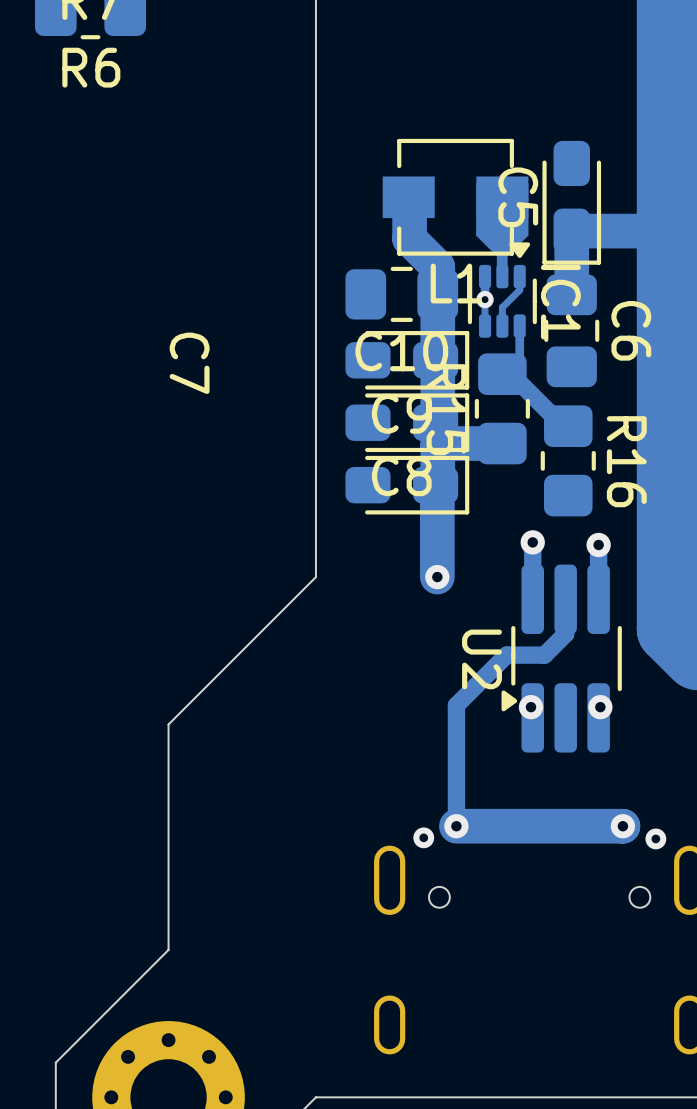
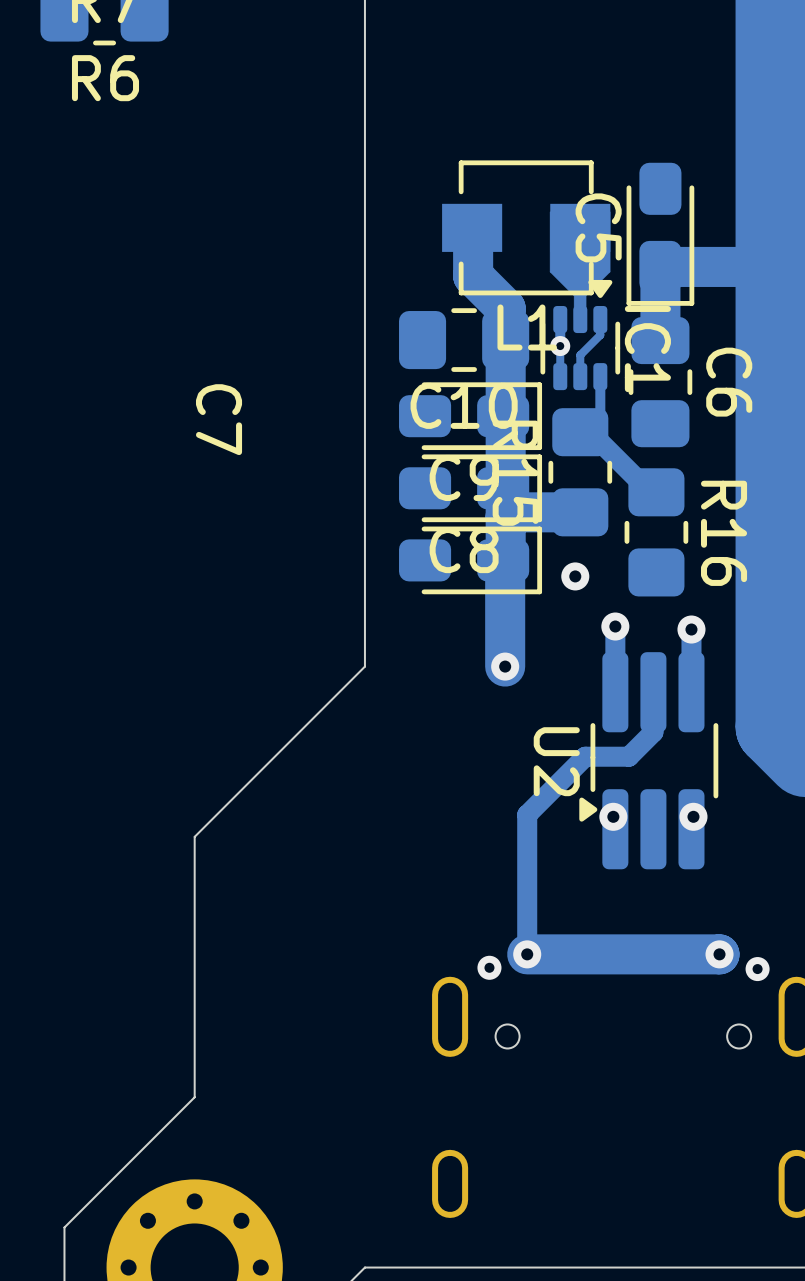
via: none -> (575, 576)

